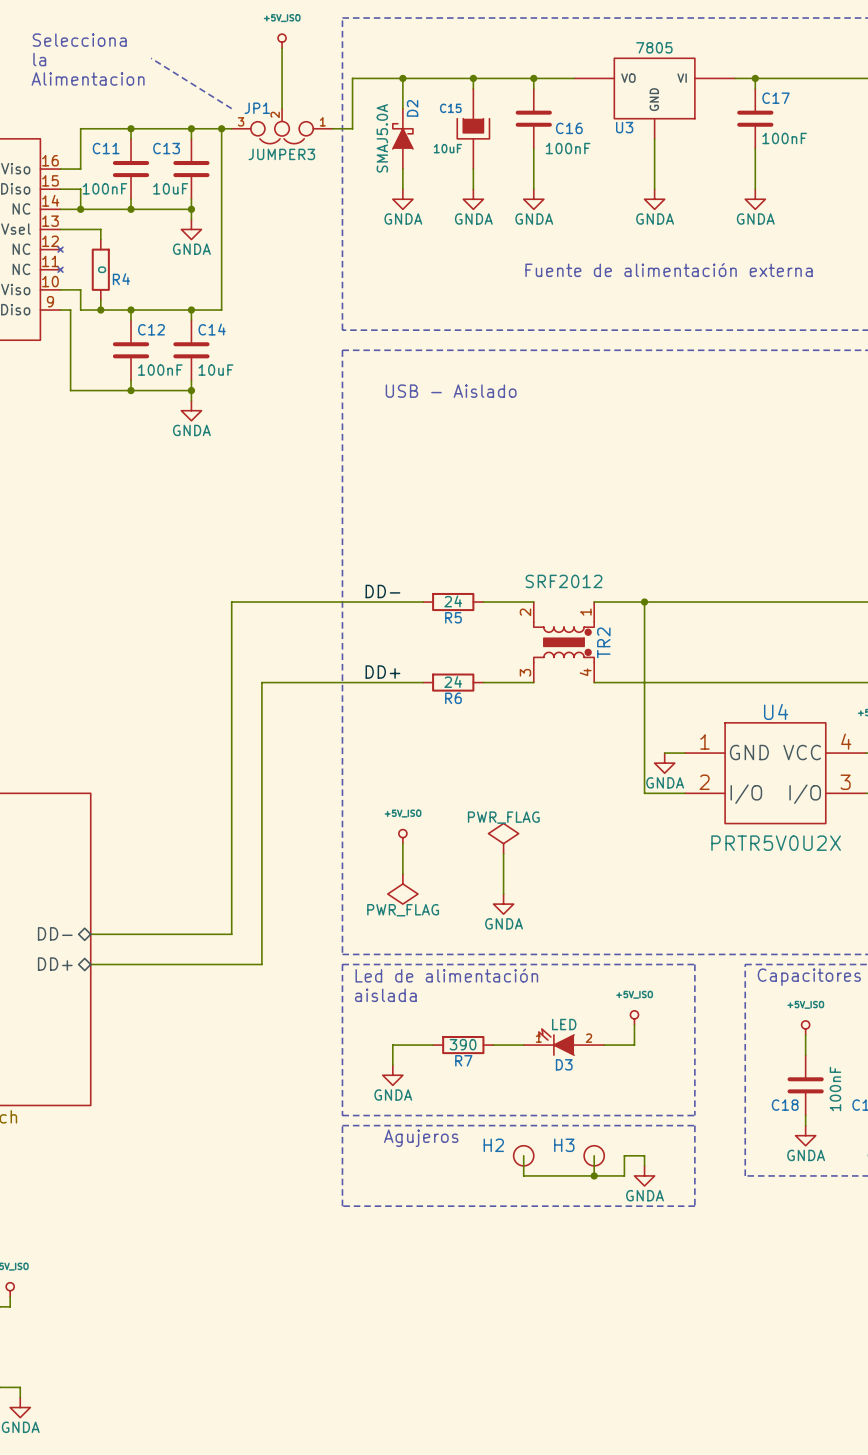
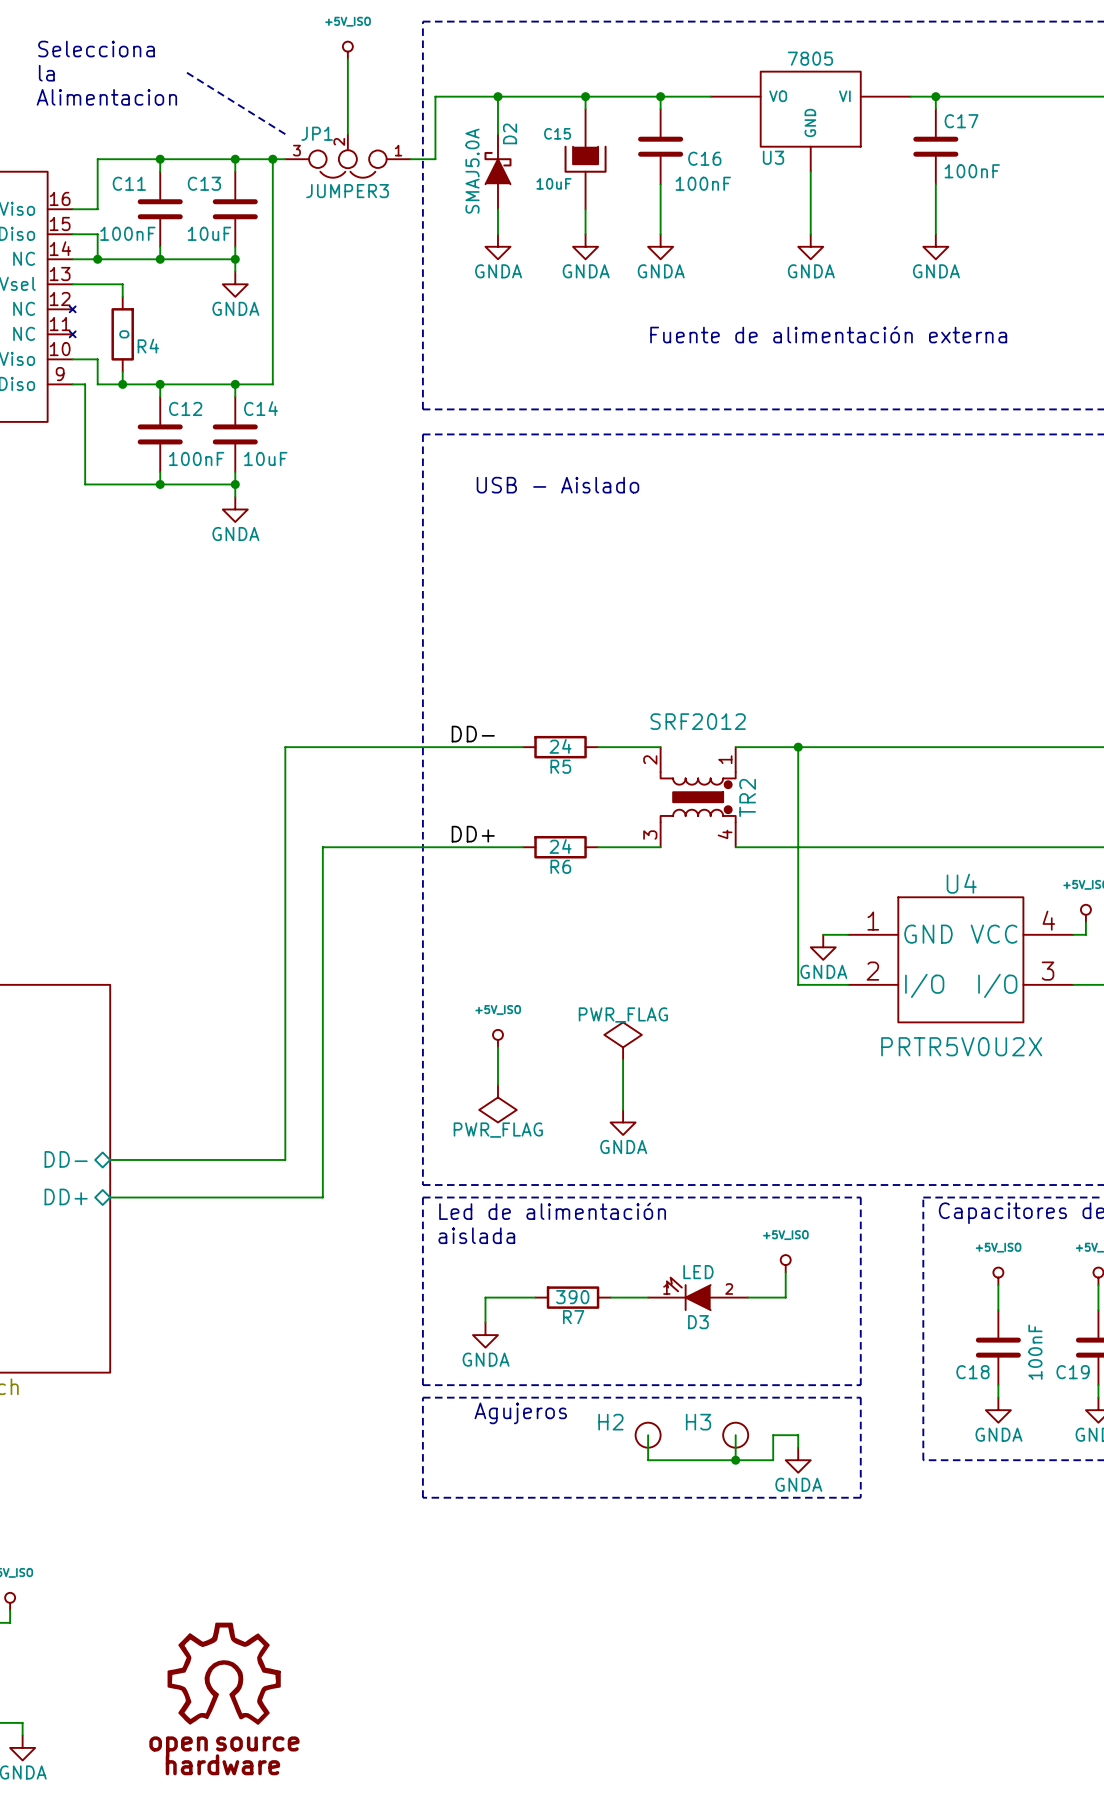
power symbol: none -> (224, 1673)

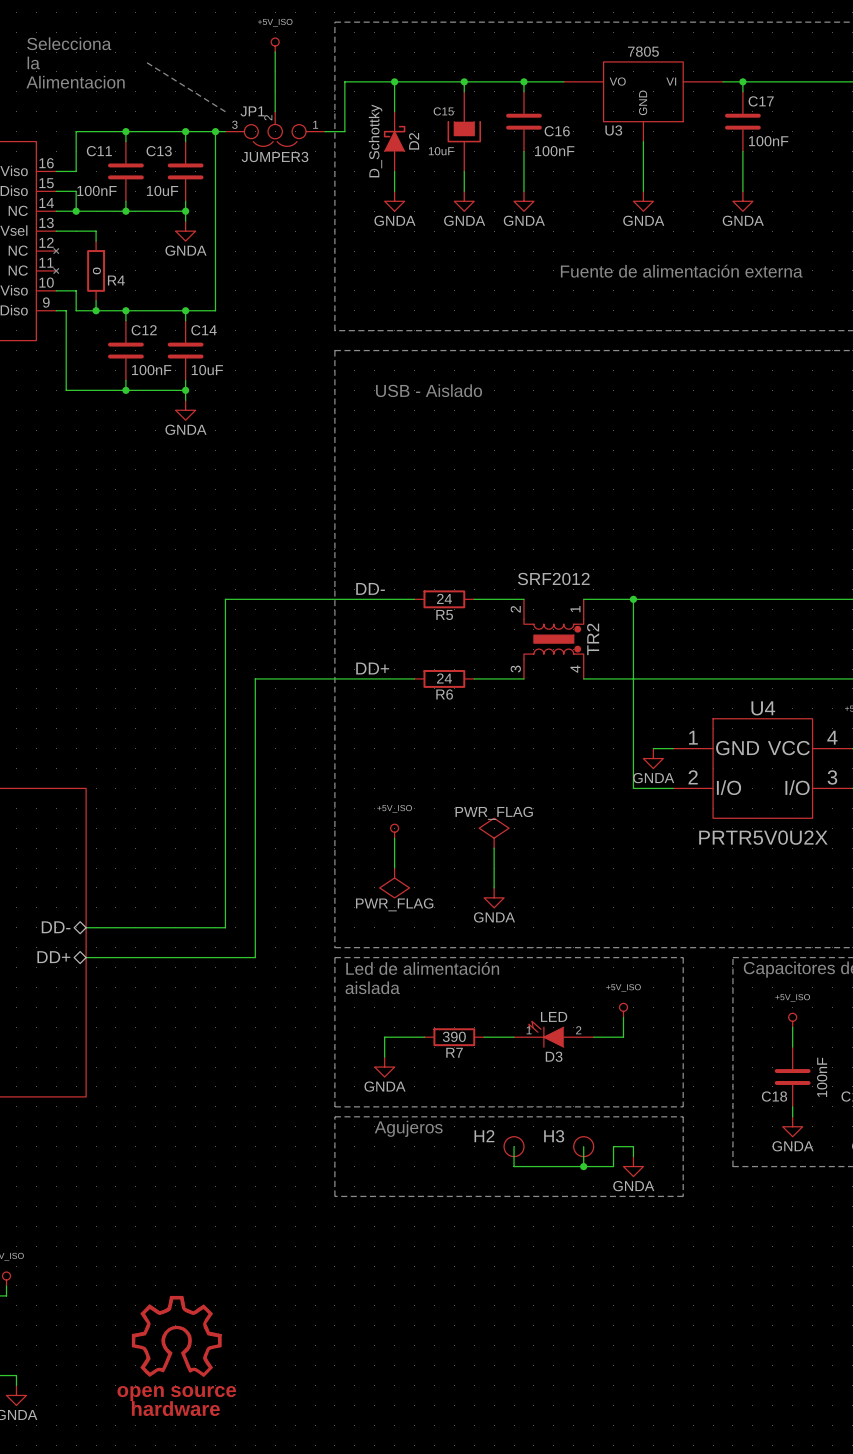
D2 name position: D2 (510, 133) -> D2 (414, 141)
D2 flip: as is (497, 168) -> left-right (394, 138)
D2 value: SMAJ5.0A (472, 171) -> D_Schottky (375, 141)

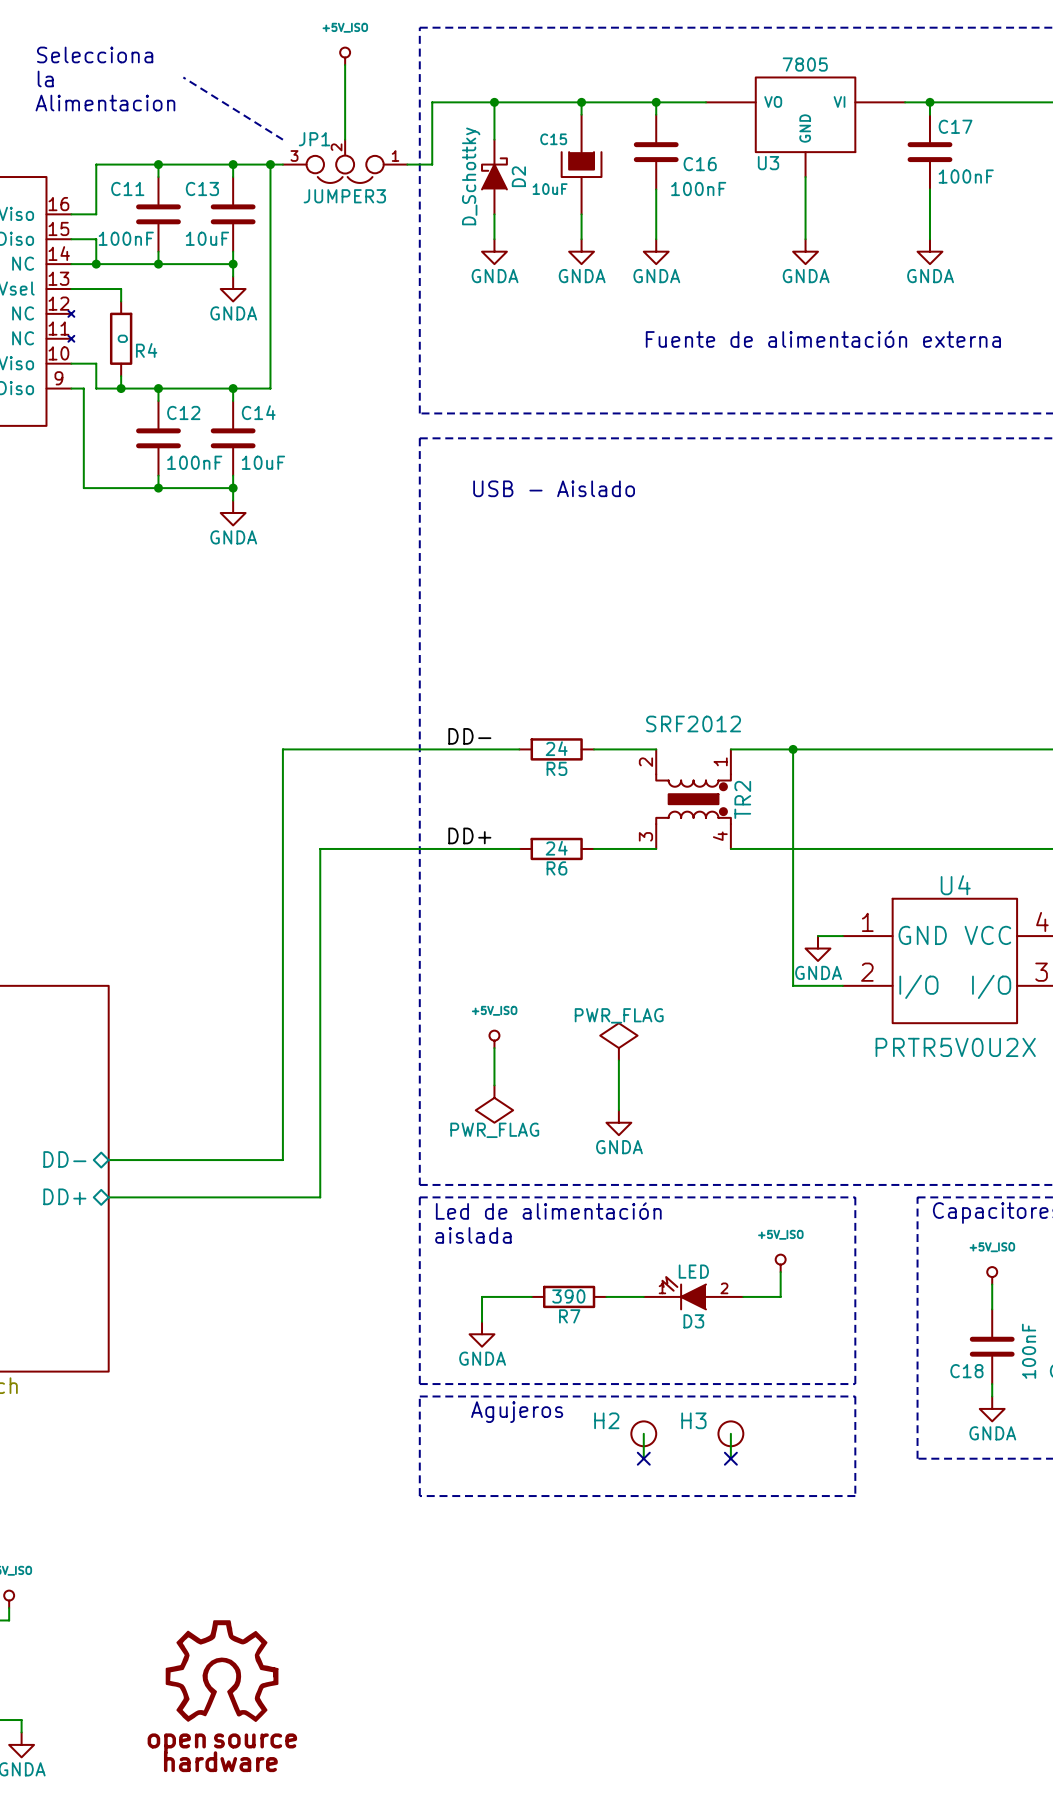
wire: (633, 1156) (633, 1146) (613, 1146) (613, 1166) (514, 1166) -> none
no-connect mark: none -> (643, 1458)
junction: (583, 1166) -> none
no-connect mark: none -> (730, 1458)
power symbol: GNDA (633, 1166) -> none

